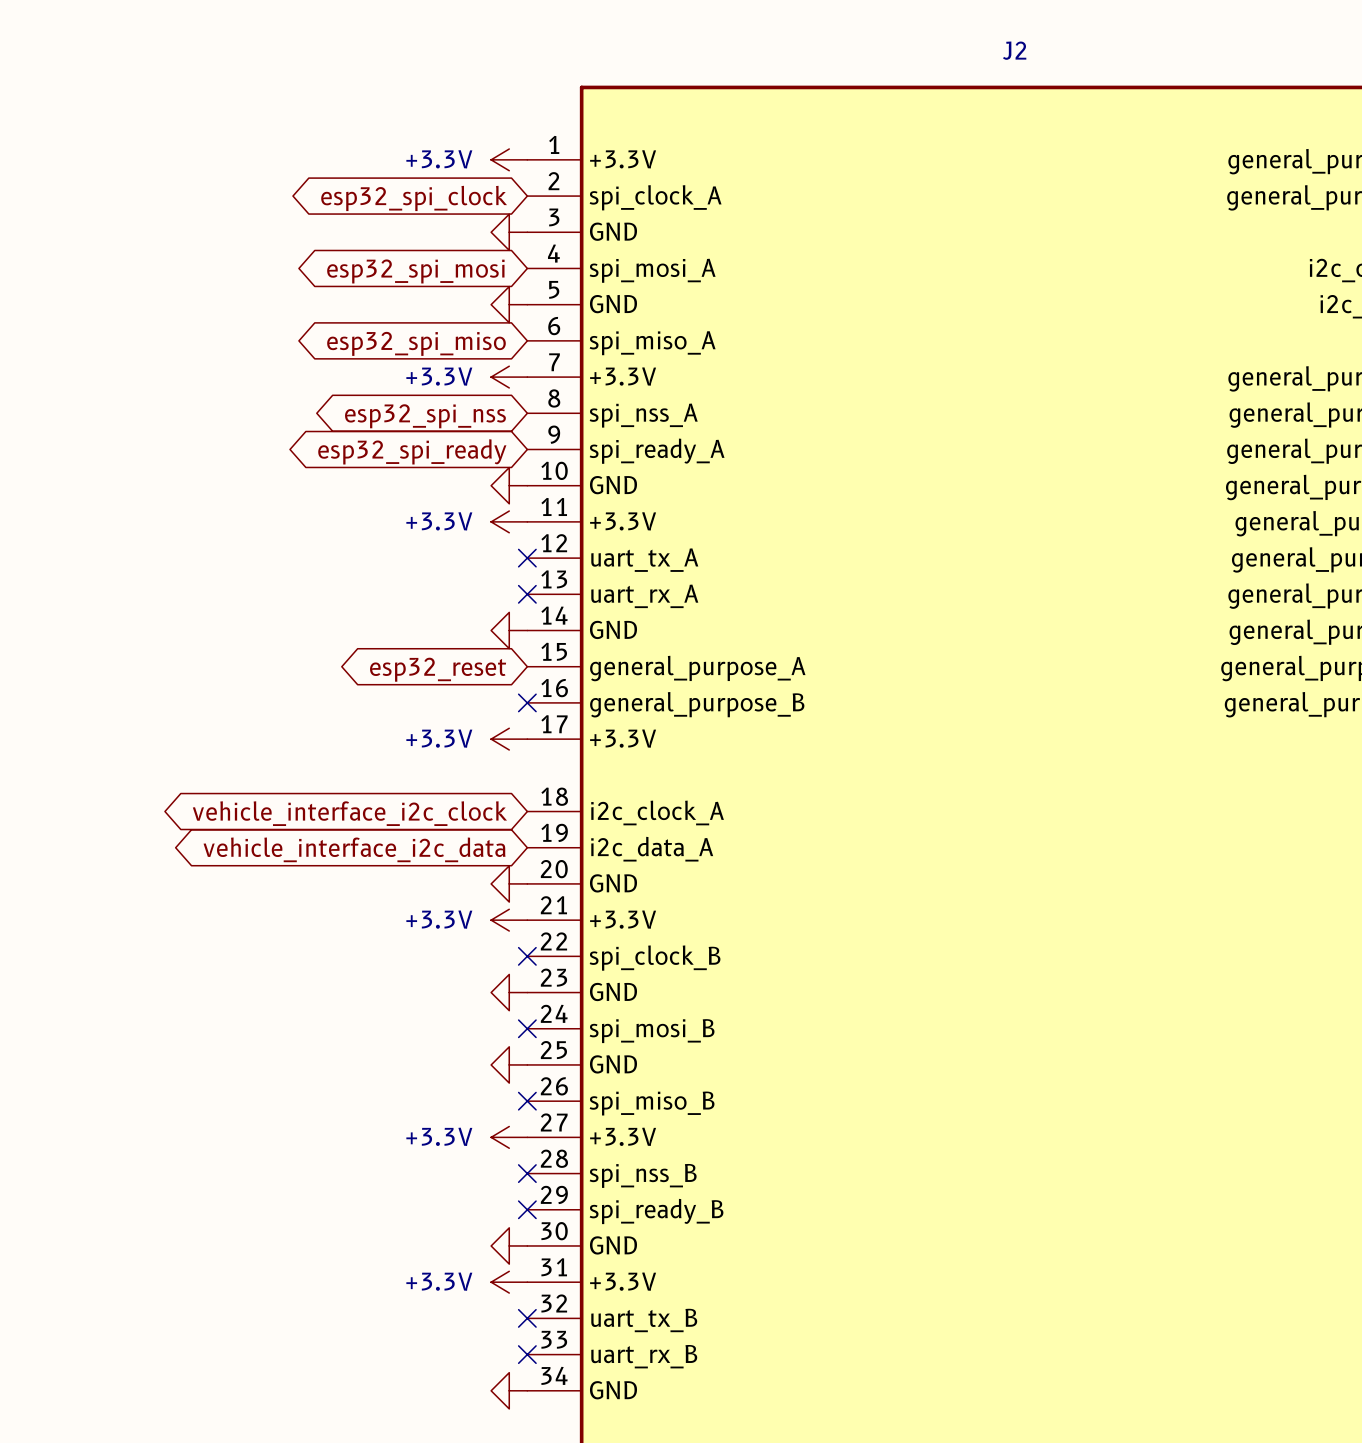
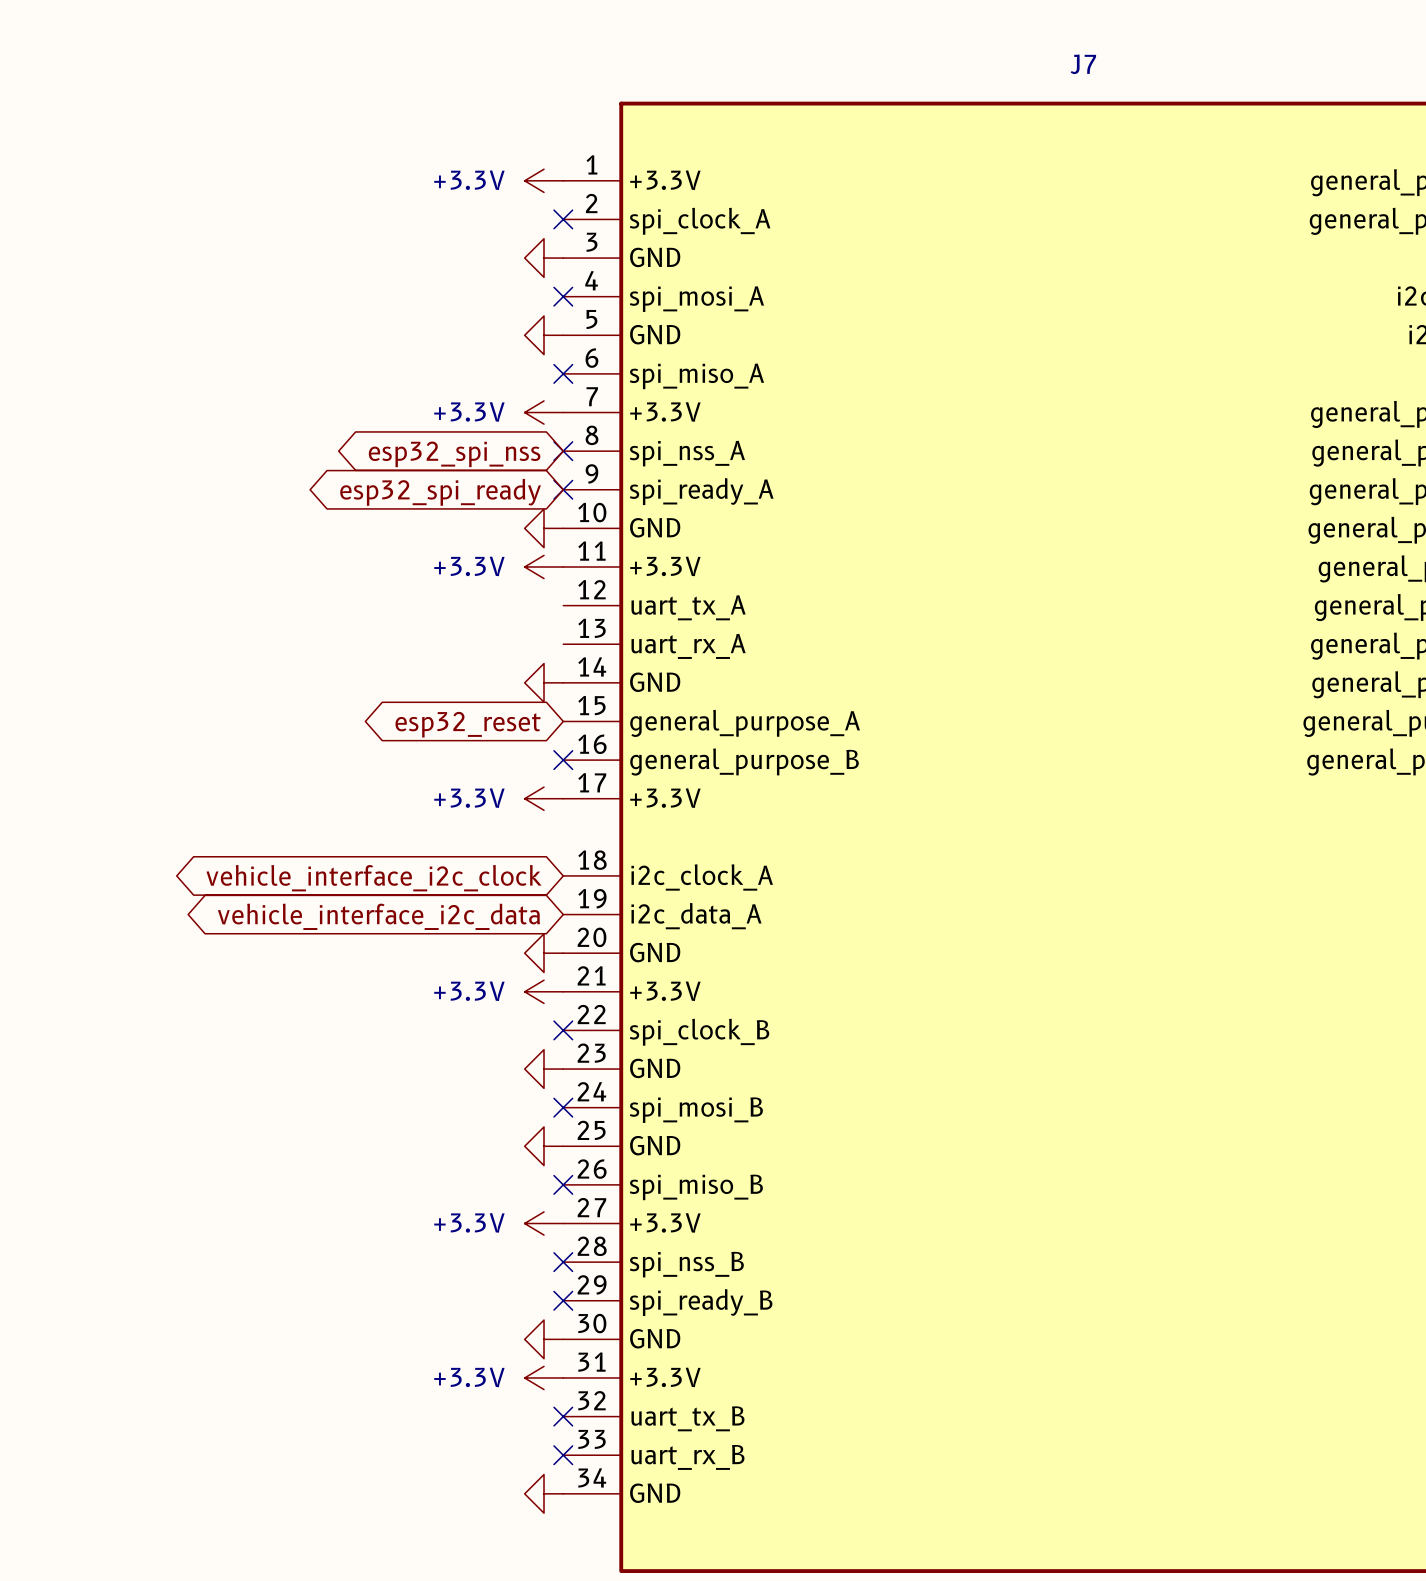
J2 name: J2 (1014, 50) -> J7 (1083, 64)
no-connect mark: none -> (563, 219)
global label: esp32_spi_clock (414, 198) -> none
no-connect mark: none -> (563, 296)
global label: esp32_spi_mosi (415, 271) -> none
no-connect mark: none -> (563, 373)
global label: esp32_spi_miso (416, 343) -> none
no-connect mark: none -> (563, 451)
no-connect mark: none -> (563, 489)
no-connect mark: (527, 558) -> none
no-connect mark: (527, 594) -> none

